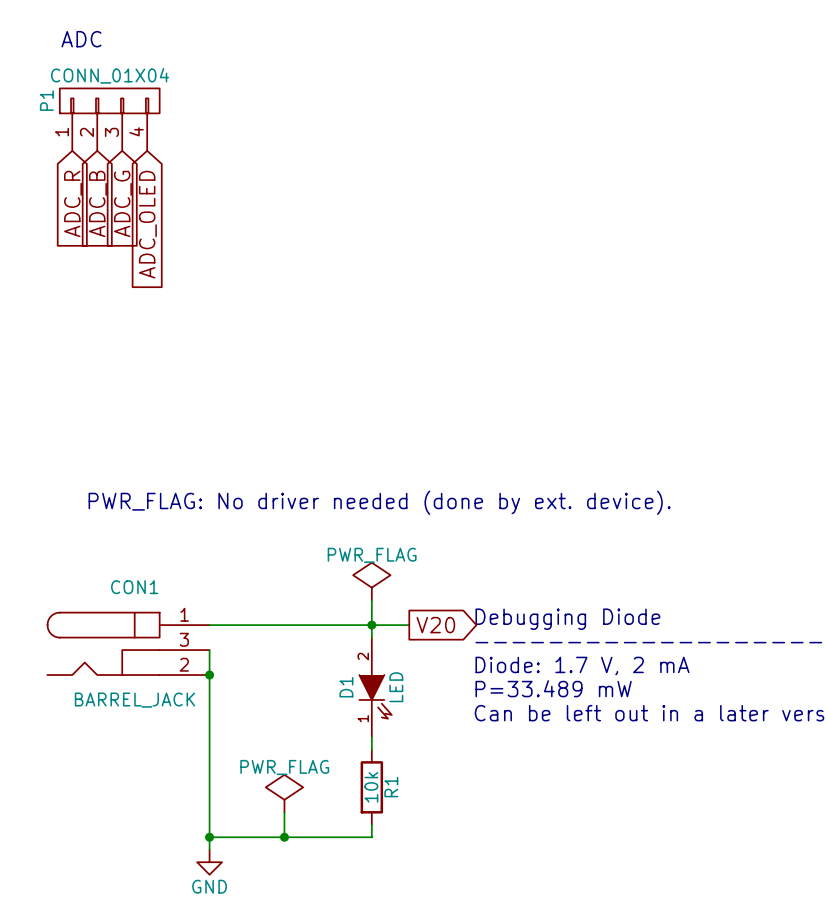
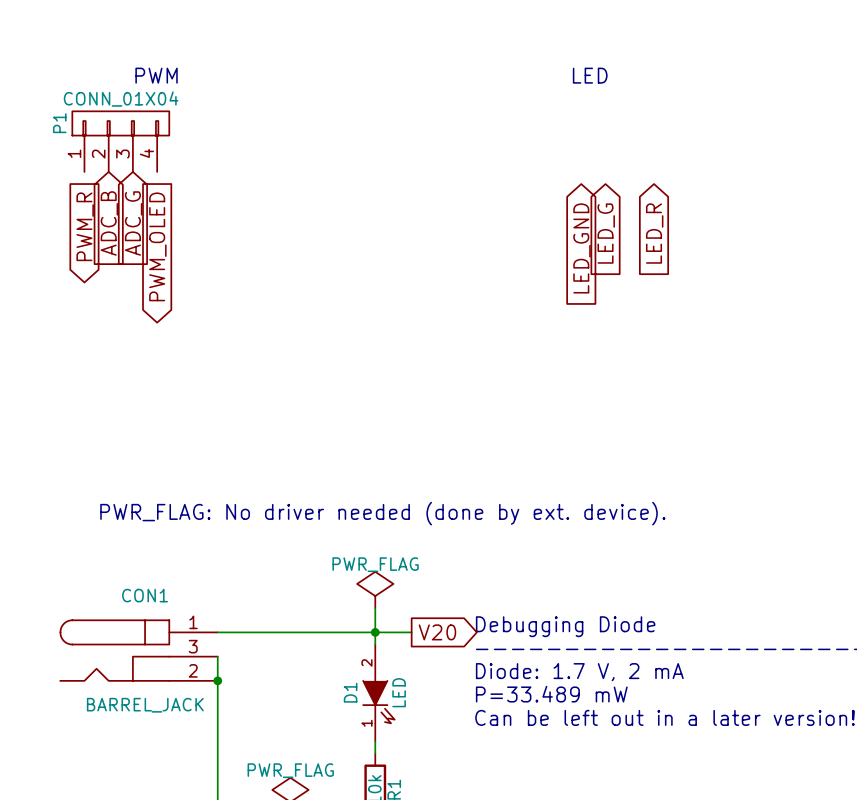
text: ADC (81, 39) -> none
text: none -> PWM (156, 75)
text: none -> LED (590, 75)
global label: ADC_R (73, 203) -> none
global label: none -> PWM_R (85, 226)
global label: none -> LED_G (606, 233)
global label: none -> LED_R (654, 233)
global label shape: input (147, 224) -> output (157, 246)
global label: ADC_OLED (147, 224) -> PWM_OLED (157, 246)
global label: none -> LED_GND (581, 248)

